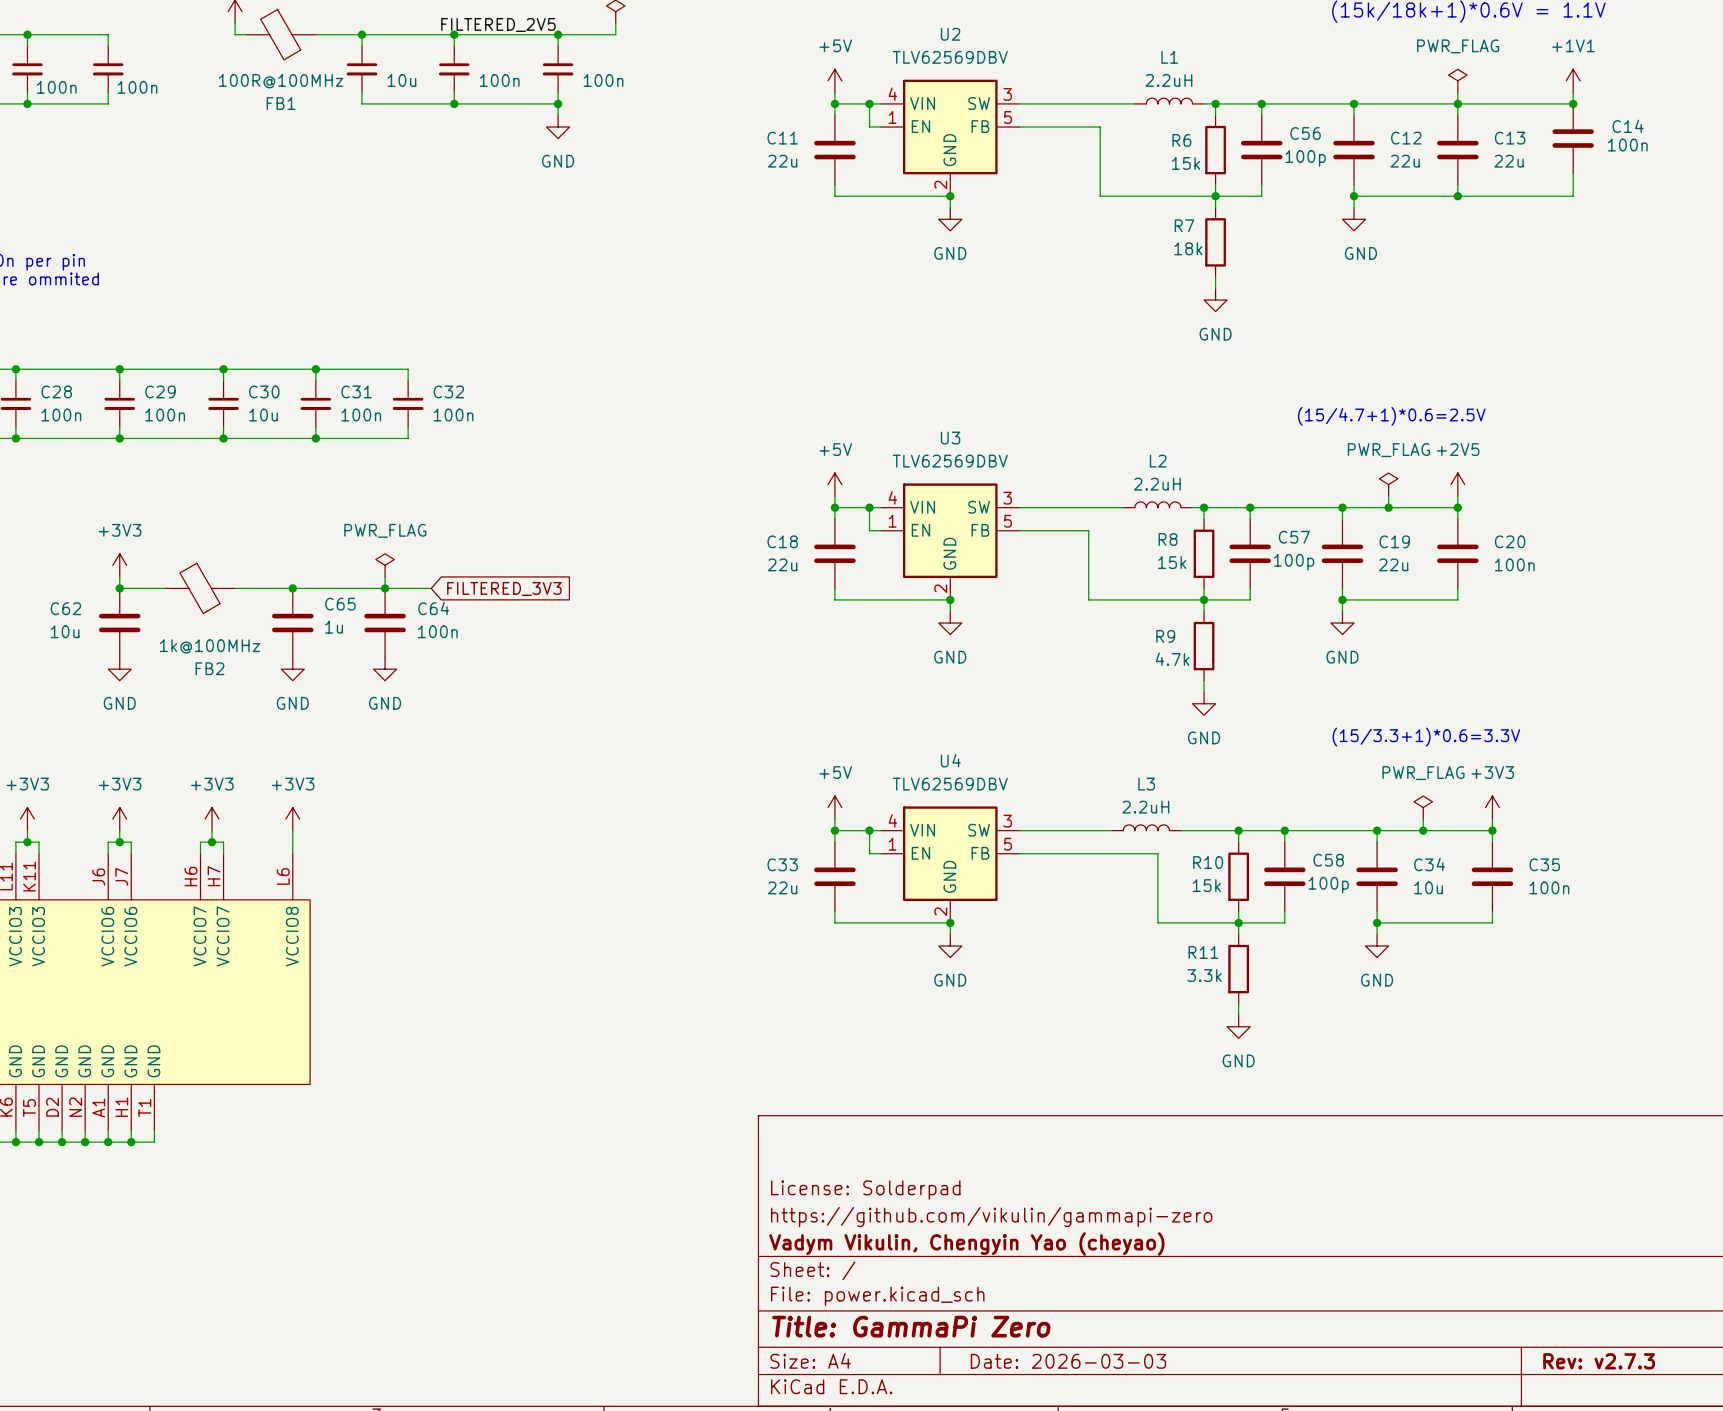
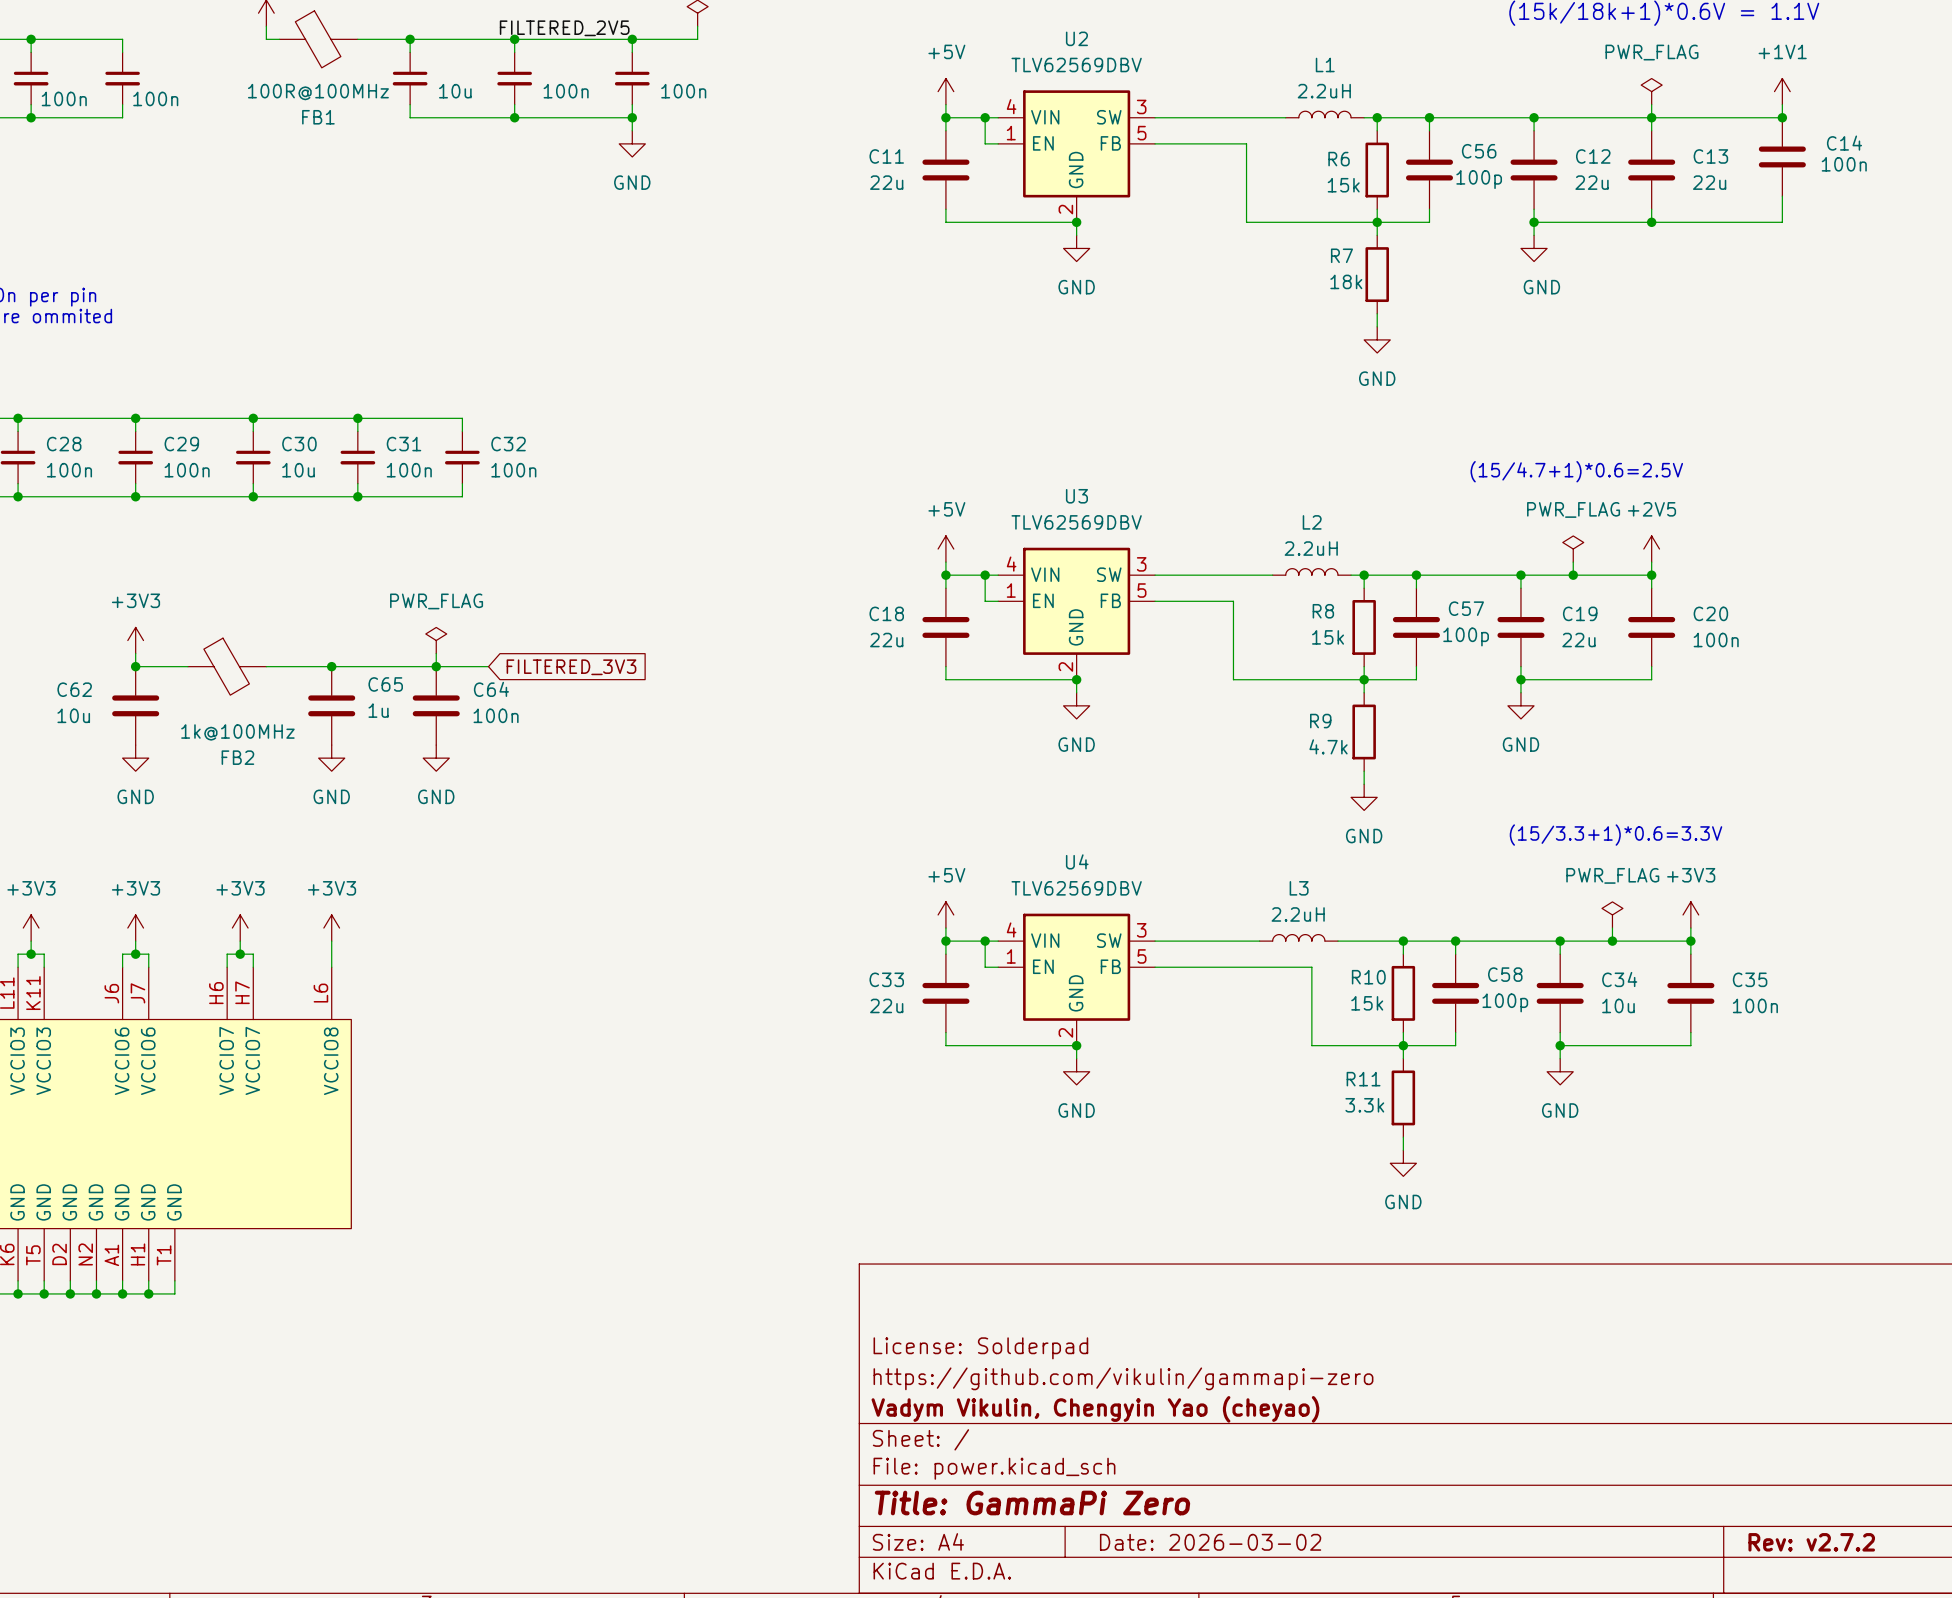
title block: Date: 2026-03-03 (1068, 1361) -> Date: 2026-03-02 (1210, 1542)
title block: Rev: v2.7.3 (1599, 1361) -> Rev: v2.7.2 (1811, 1542)

